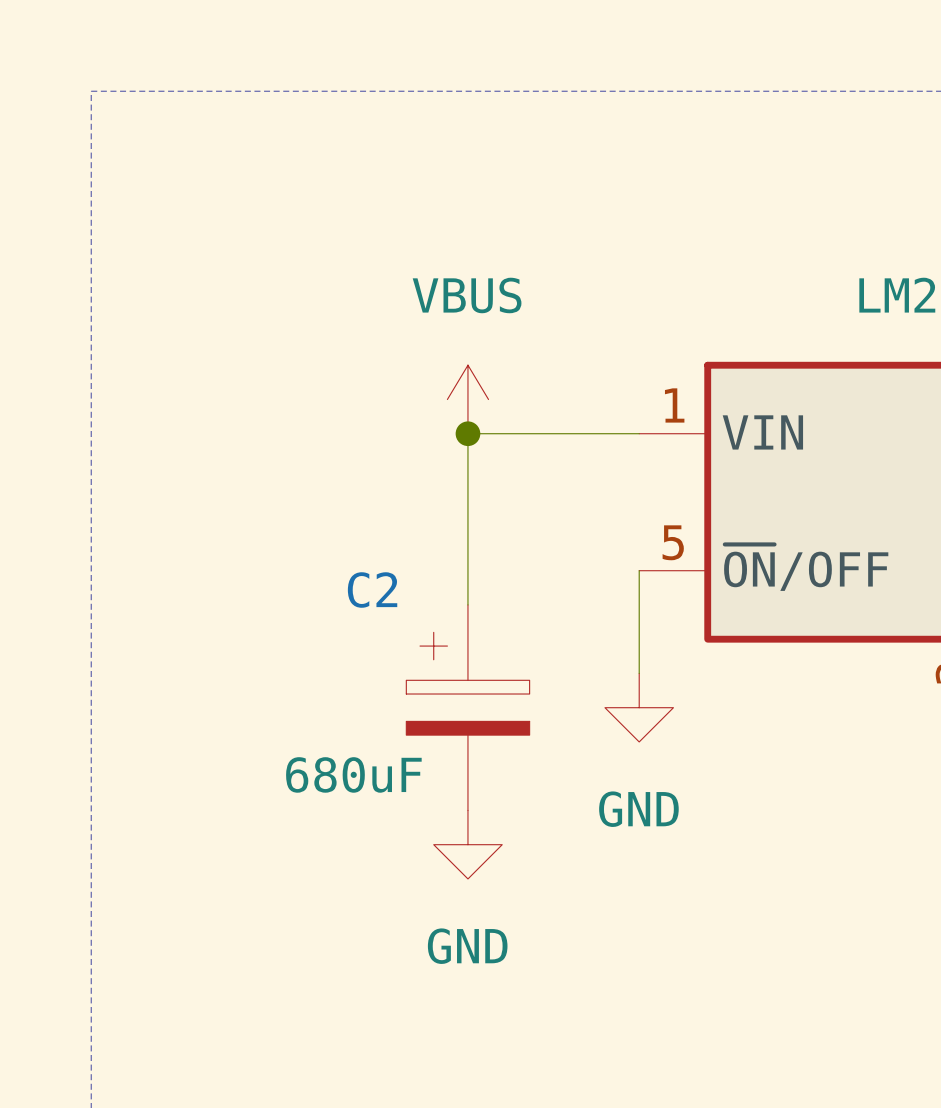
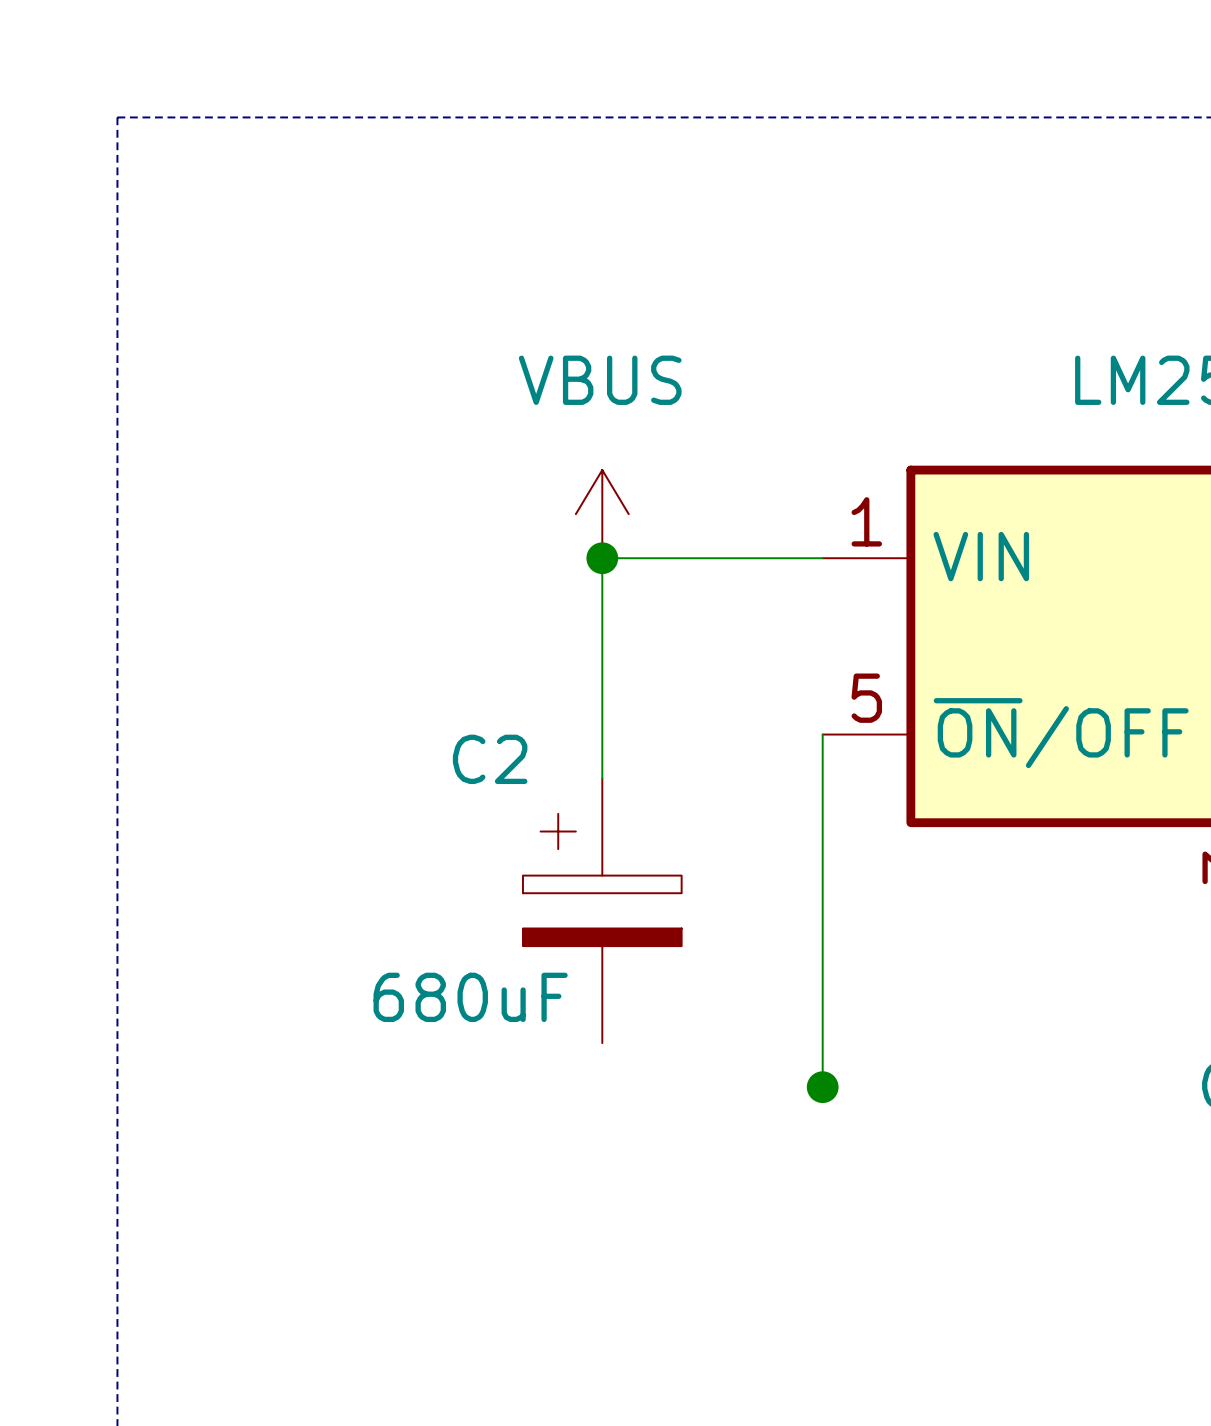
wire: none -> (822, 866) (822, 1087)
power symbol: GND (639, 707) -> none
power symbol: GND (467, 844) -> none
junction: none -> (822, 1087)

